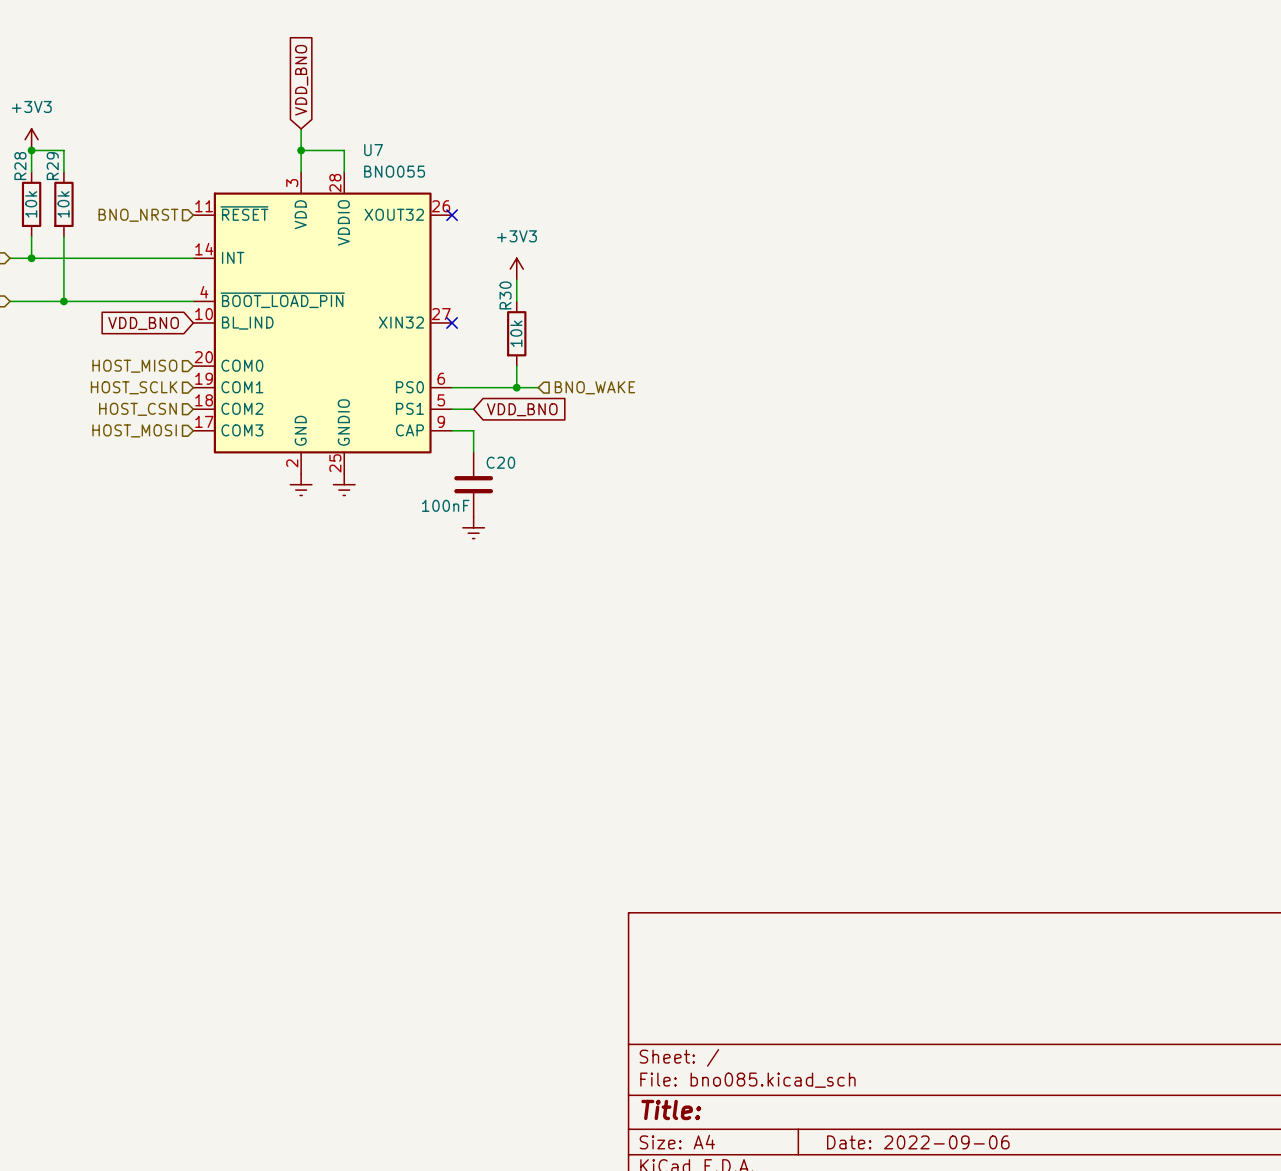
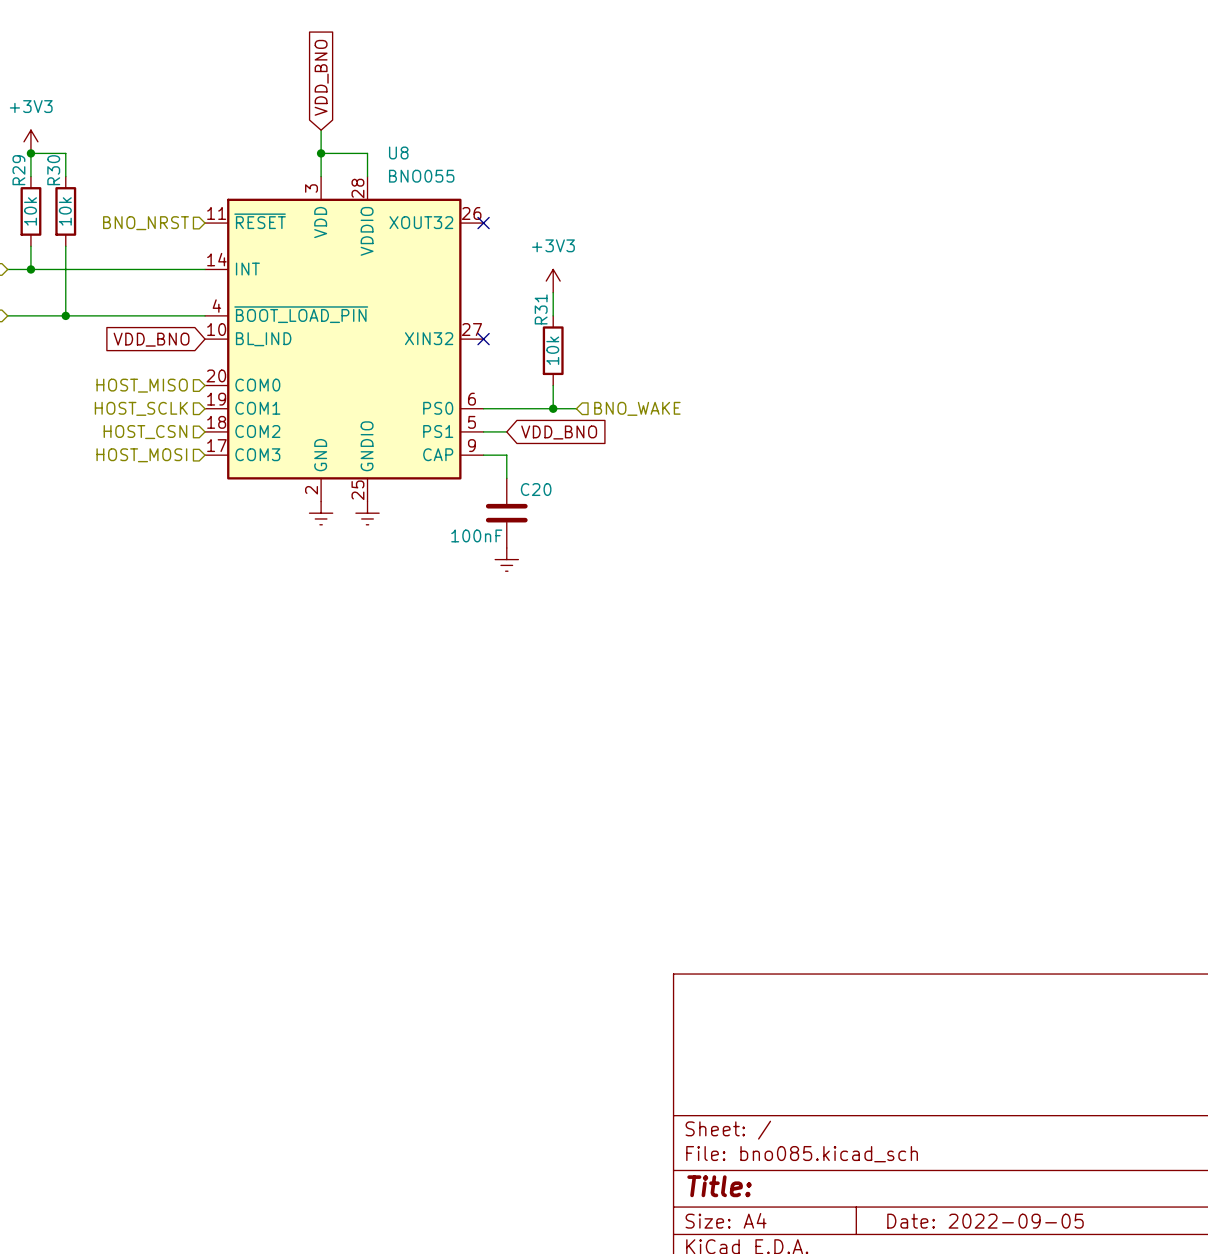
U7 name: U7 (373, 150) -> U8 (398, 152)
R28 name: R28 (20, 166) -> R29 (18, 170)
R29 name: R29 (52, 166) -> R30 (53, 170)
R30 name: R30 (505, 295) -> R31 (541, 309)
title block: Date: 2022-09-06 (918, 1142) -> Date: 2022-09-05 (985, 1221)

